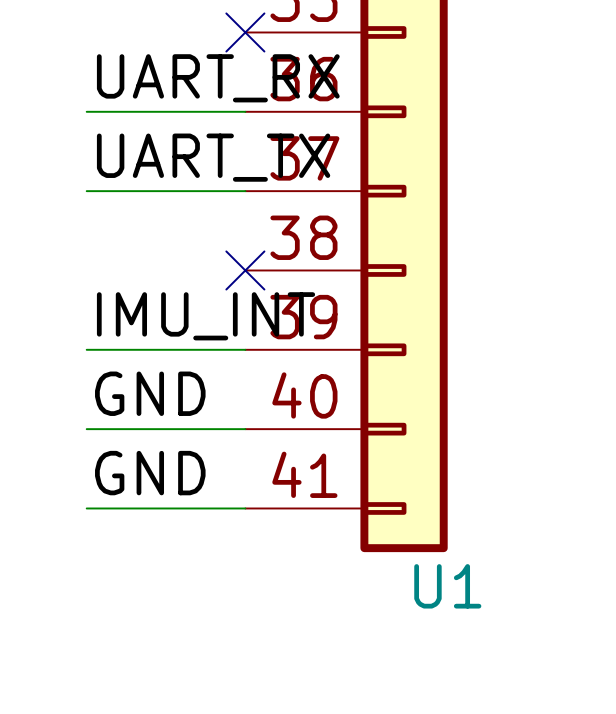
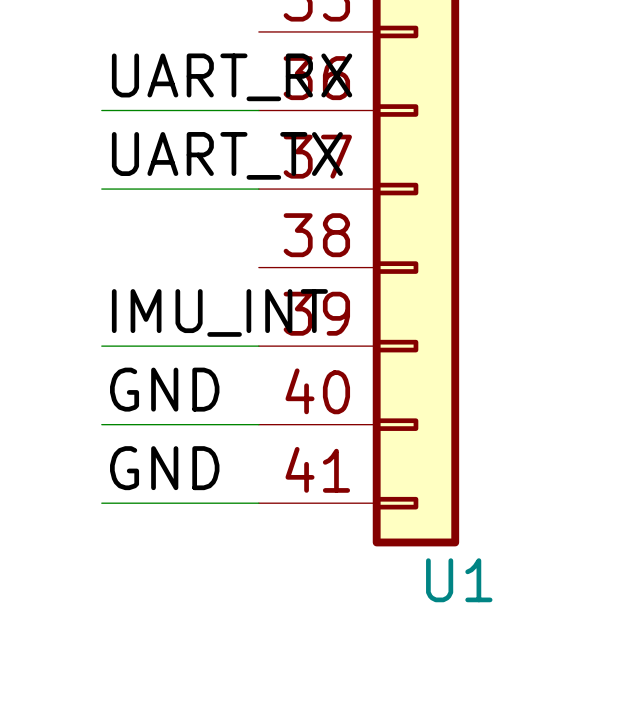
no-connect mark: (245, 32) -> none
no-connect mark: (245, 270) -> none

